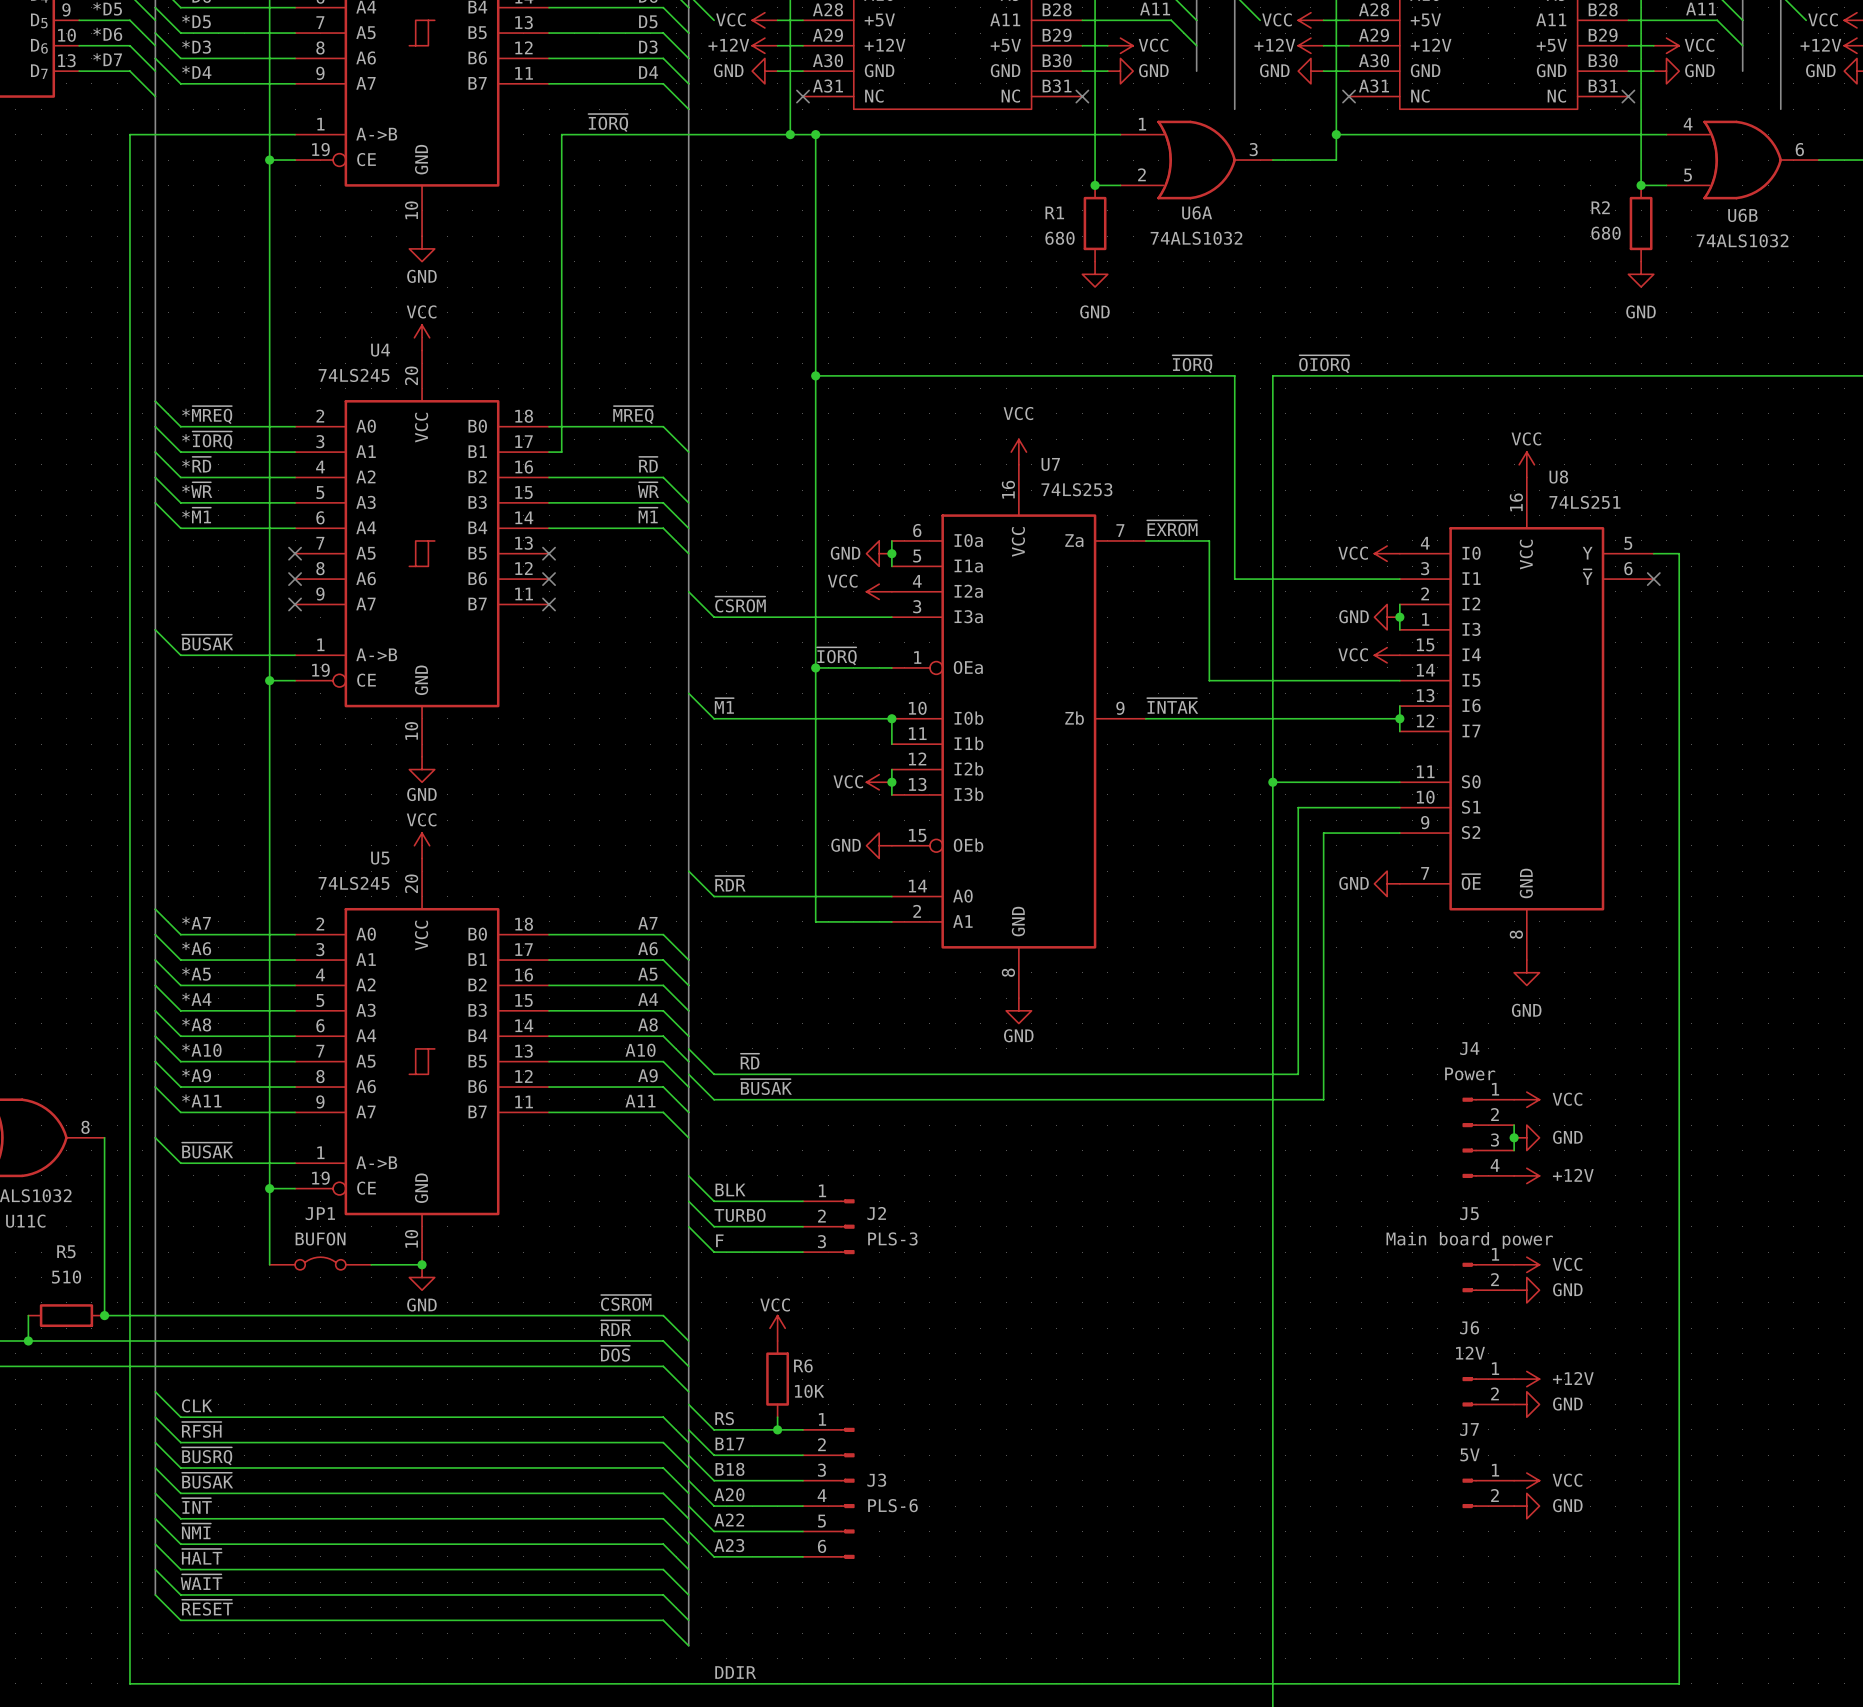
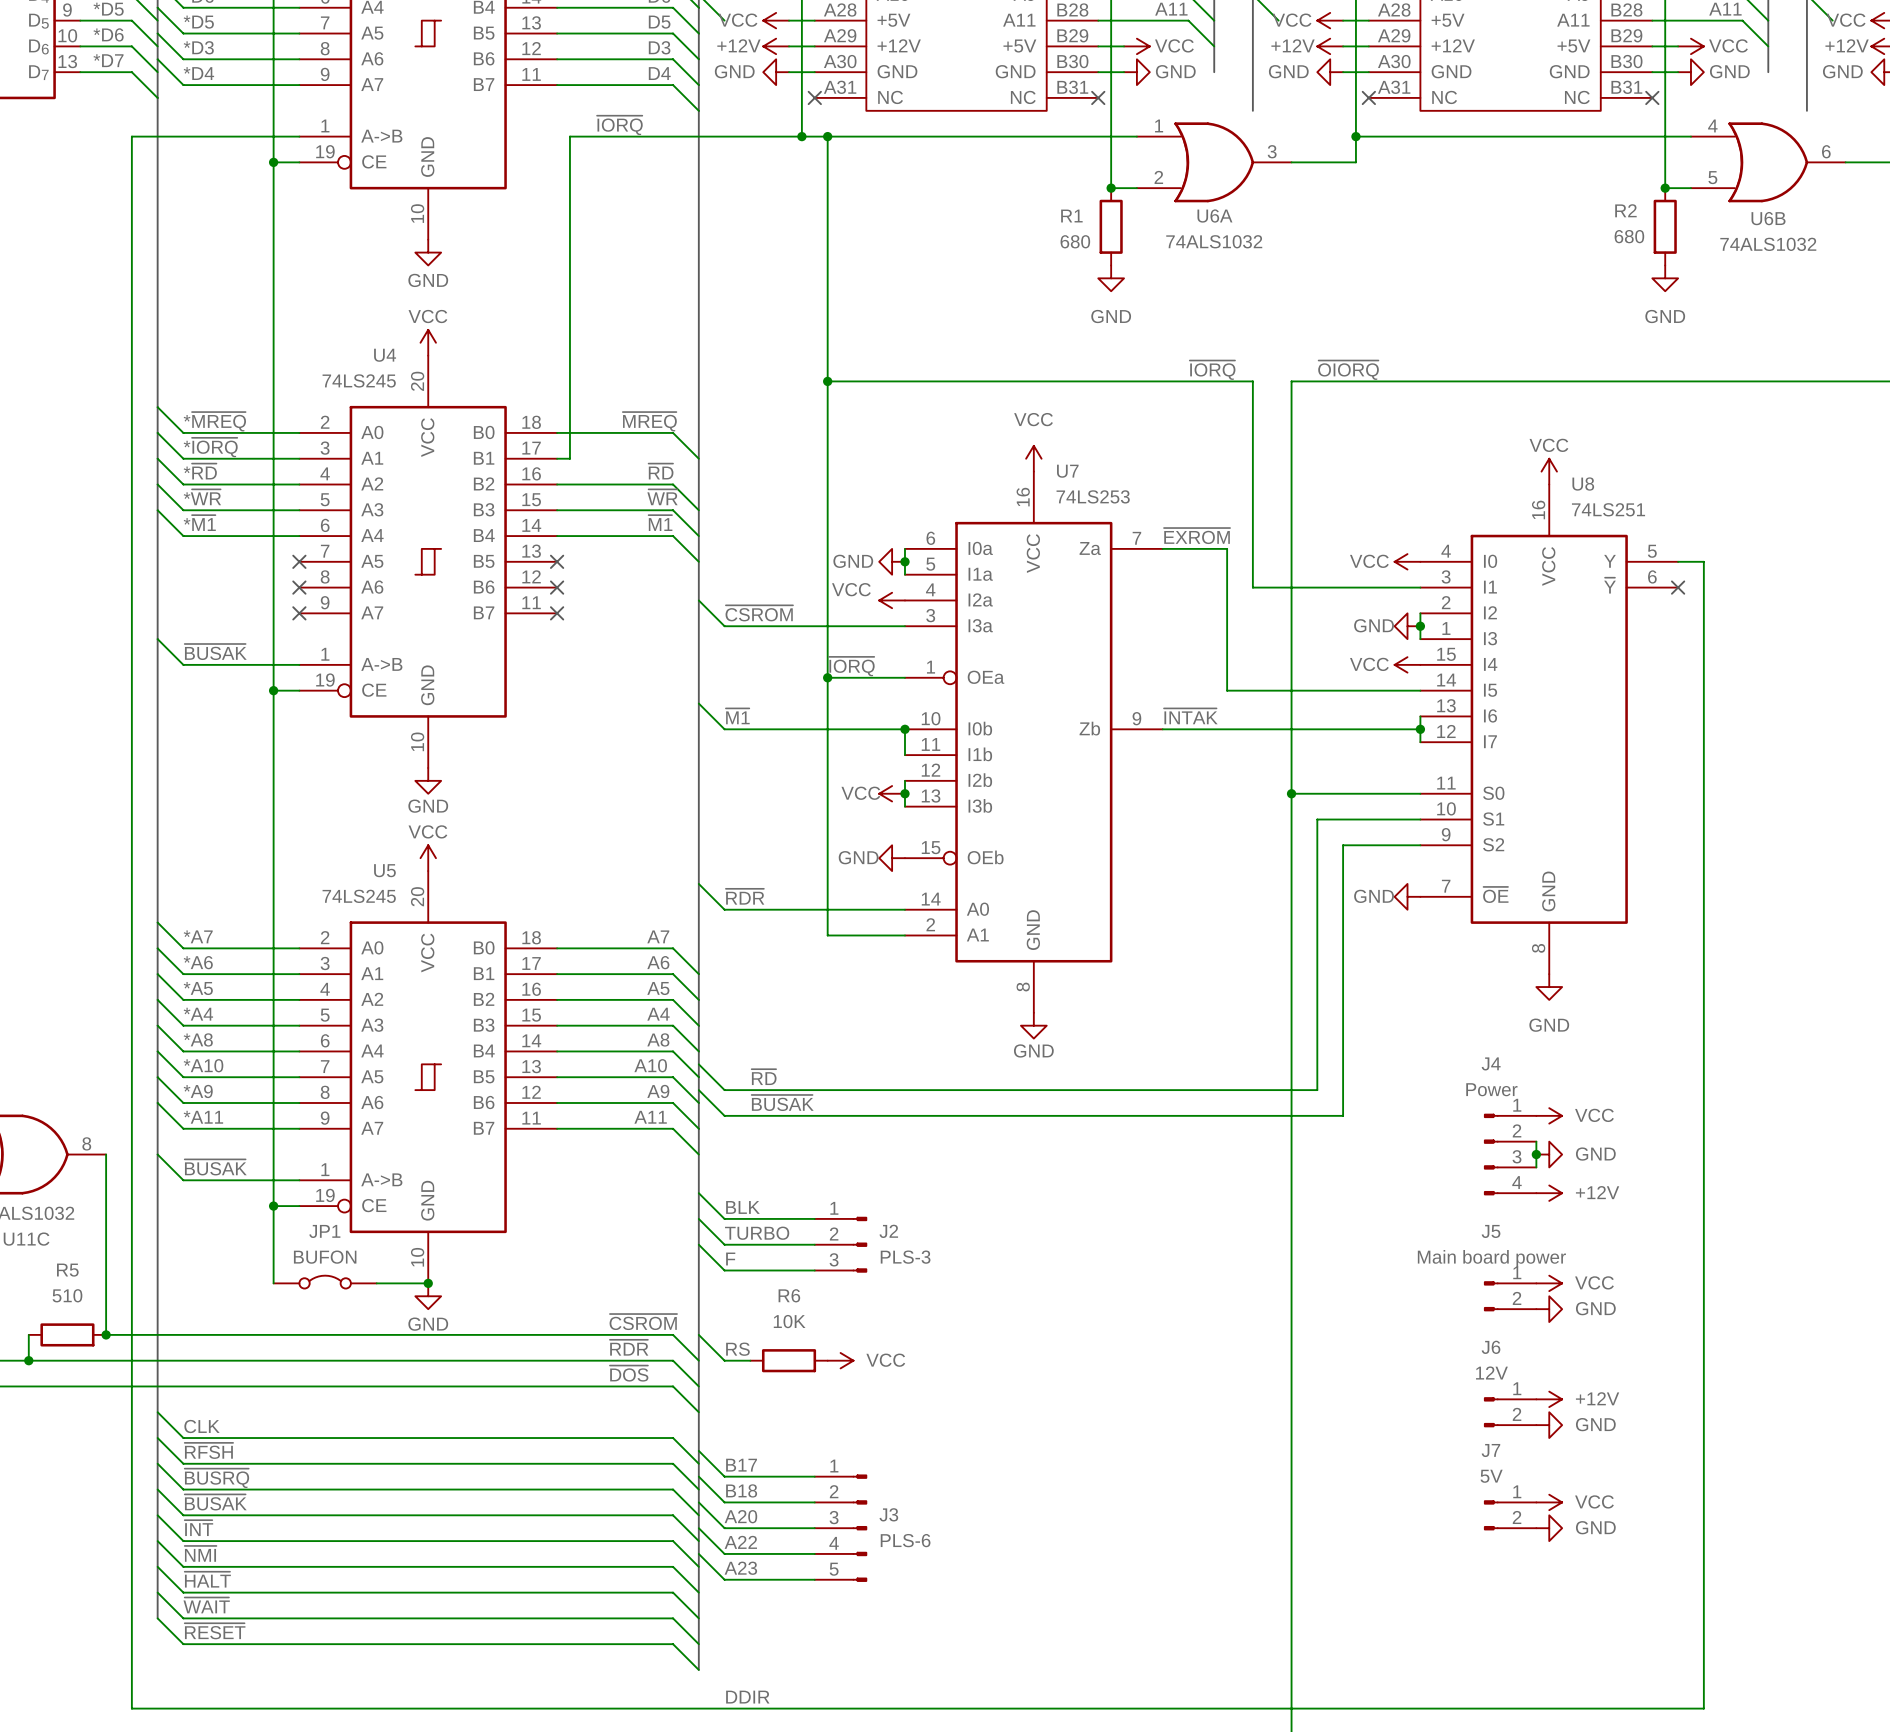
power symbol text position: VCC (775, 1304) -> VCC (885, 1360)
wire: none -> (698, 1334) (724, 1360) (750, 1360)
power symbol rotation: 0° (777, 1328) -> 90° clockwise (840, 1360)
power symbol position: VCC (777, 1328) -> VCC (840, 1360)
R6 name position: R6 (803, 1365) -> R6 (789, 1295)
R6 rotation: 0° (777, 1379) -> 90° clockwise (789, 1360)
R6 value position: 10K (809, 1391) -> 10K (789, 1321)
wire: (688, 1404) (714, 1429) (802, 1429) -> none
wire: (777, 1417) (777, 1429) -> none
label position: RS (724, 1418) -> RS (737, 1349)
J3 symbol: [802, 1427, 855, 1559] -> [814, 1474, 868, 1582]
junction: (777, 1429) -> none

